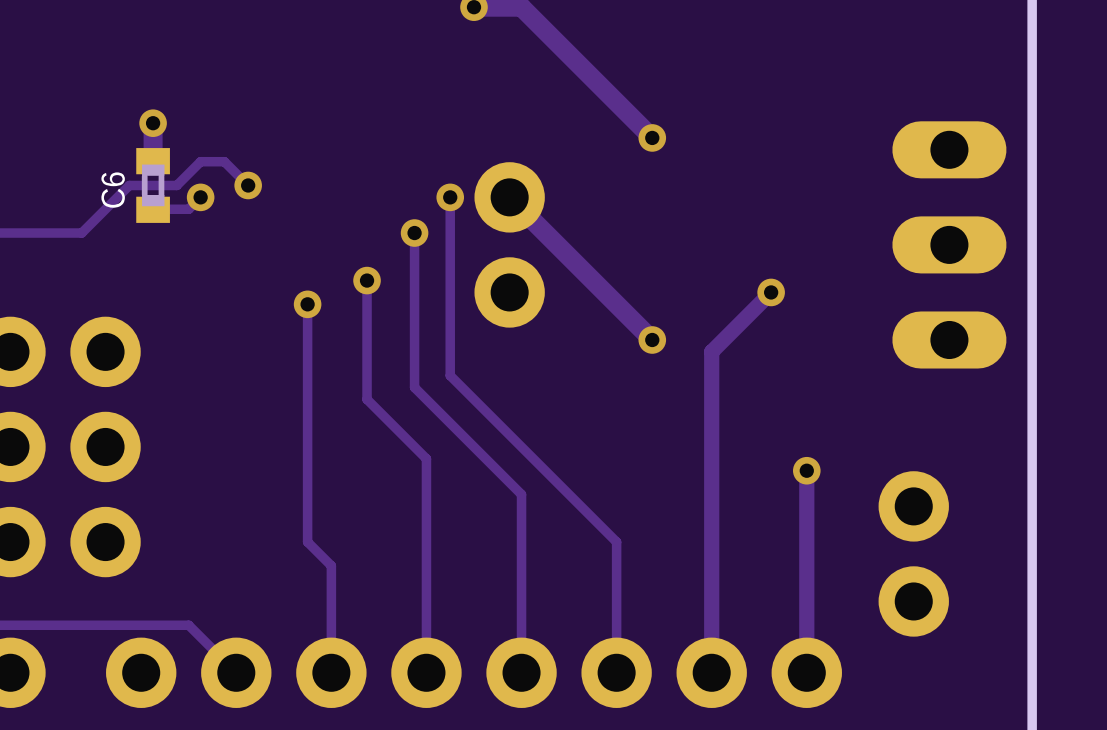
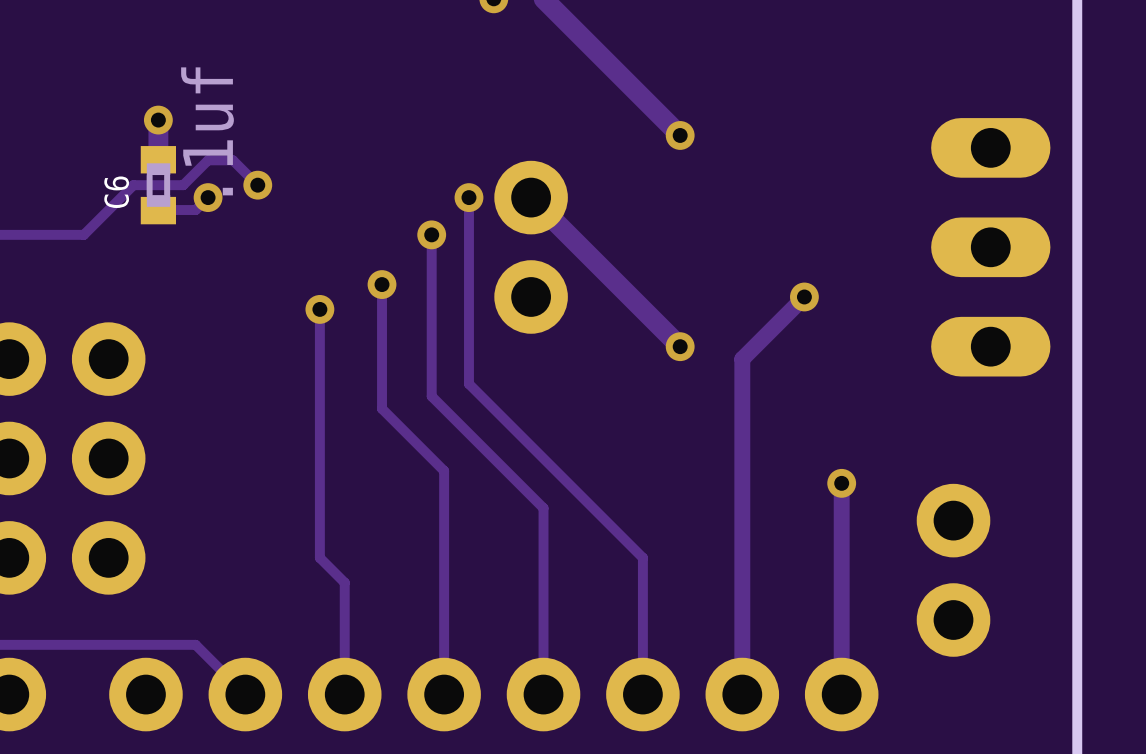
C6 value: none -> .1uf (207, 131)

